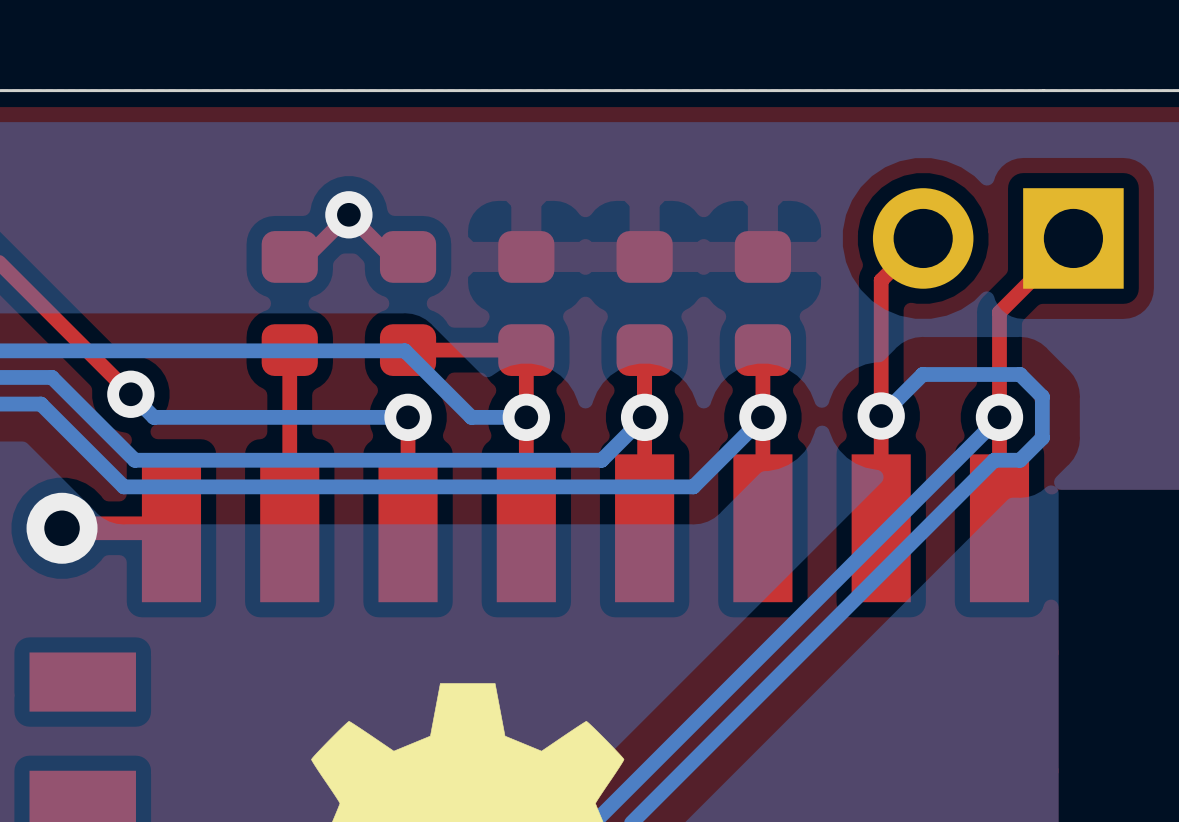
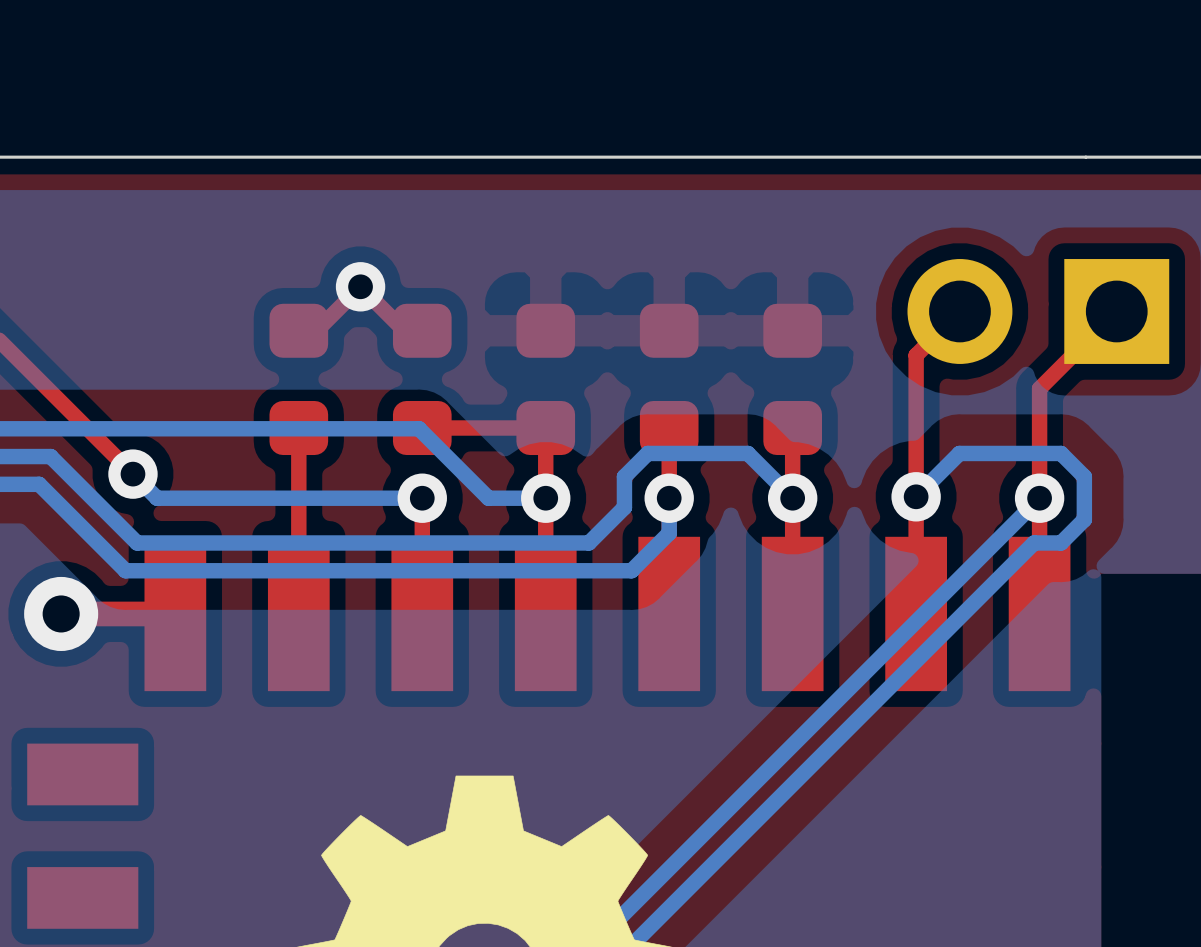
bottom track: (644, 417) (601, 460) (567, 460) -> (669, 498) (669, 533) (631, 570)
bottom track: (762, 417) (693, 486) (608, 486) -> (792, 498) (747, 453) (647, 453) (624, 476) (624, 507) (588, 542)

